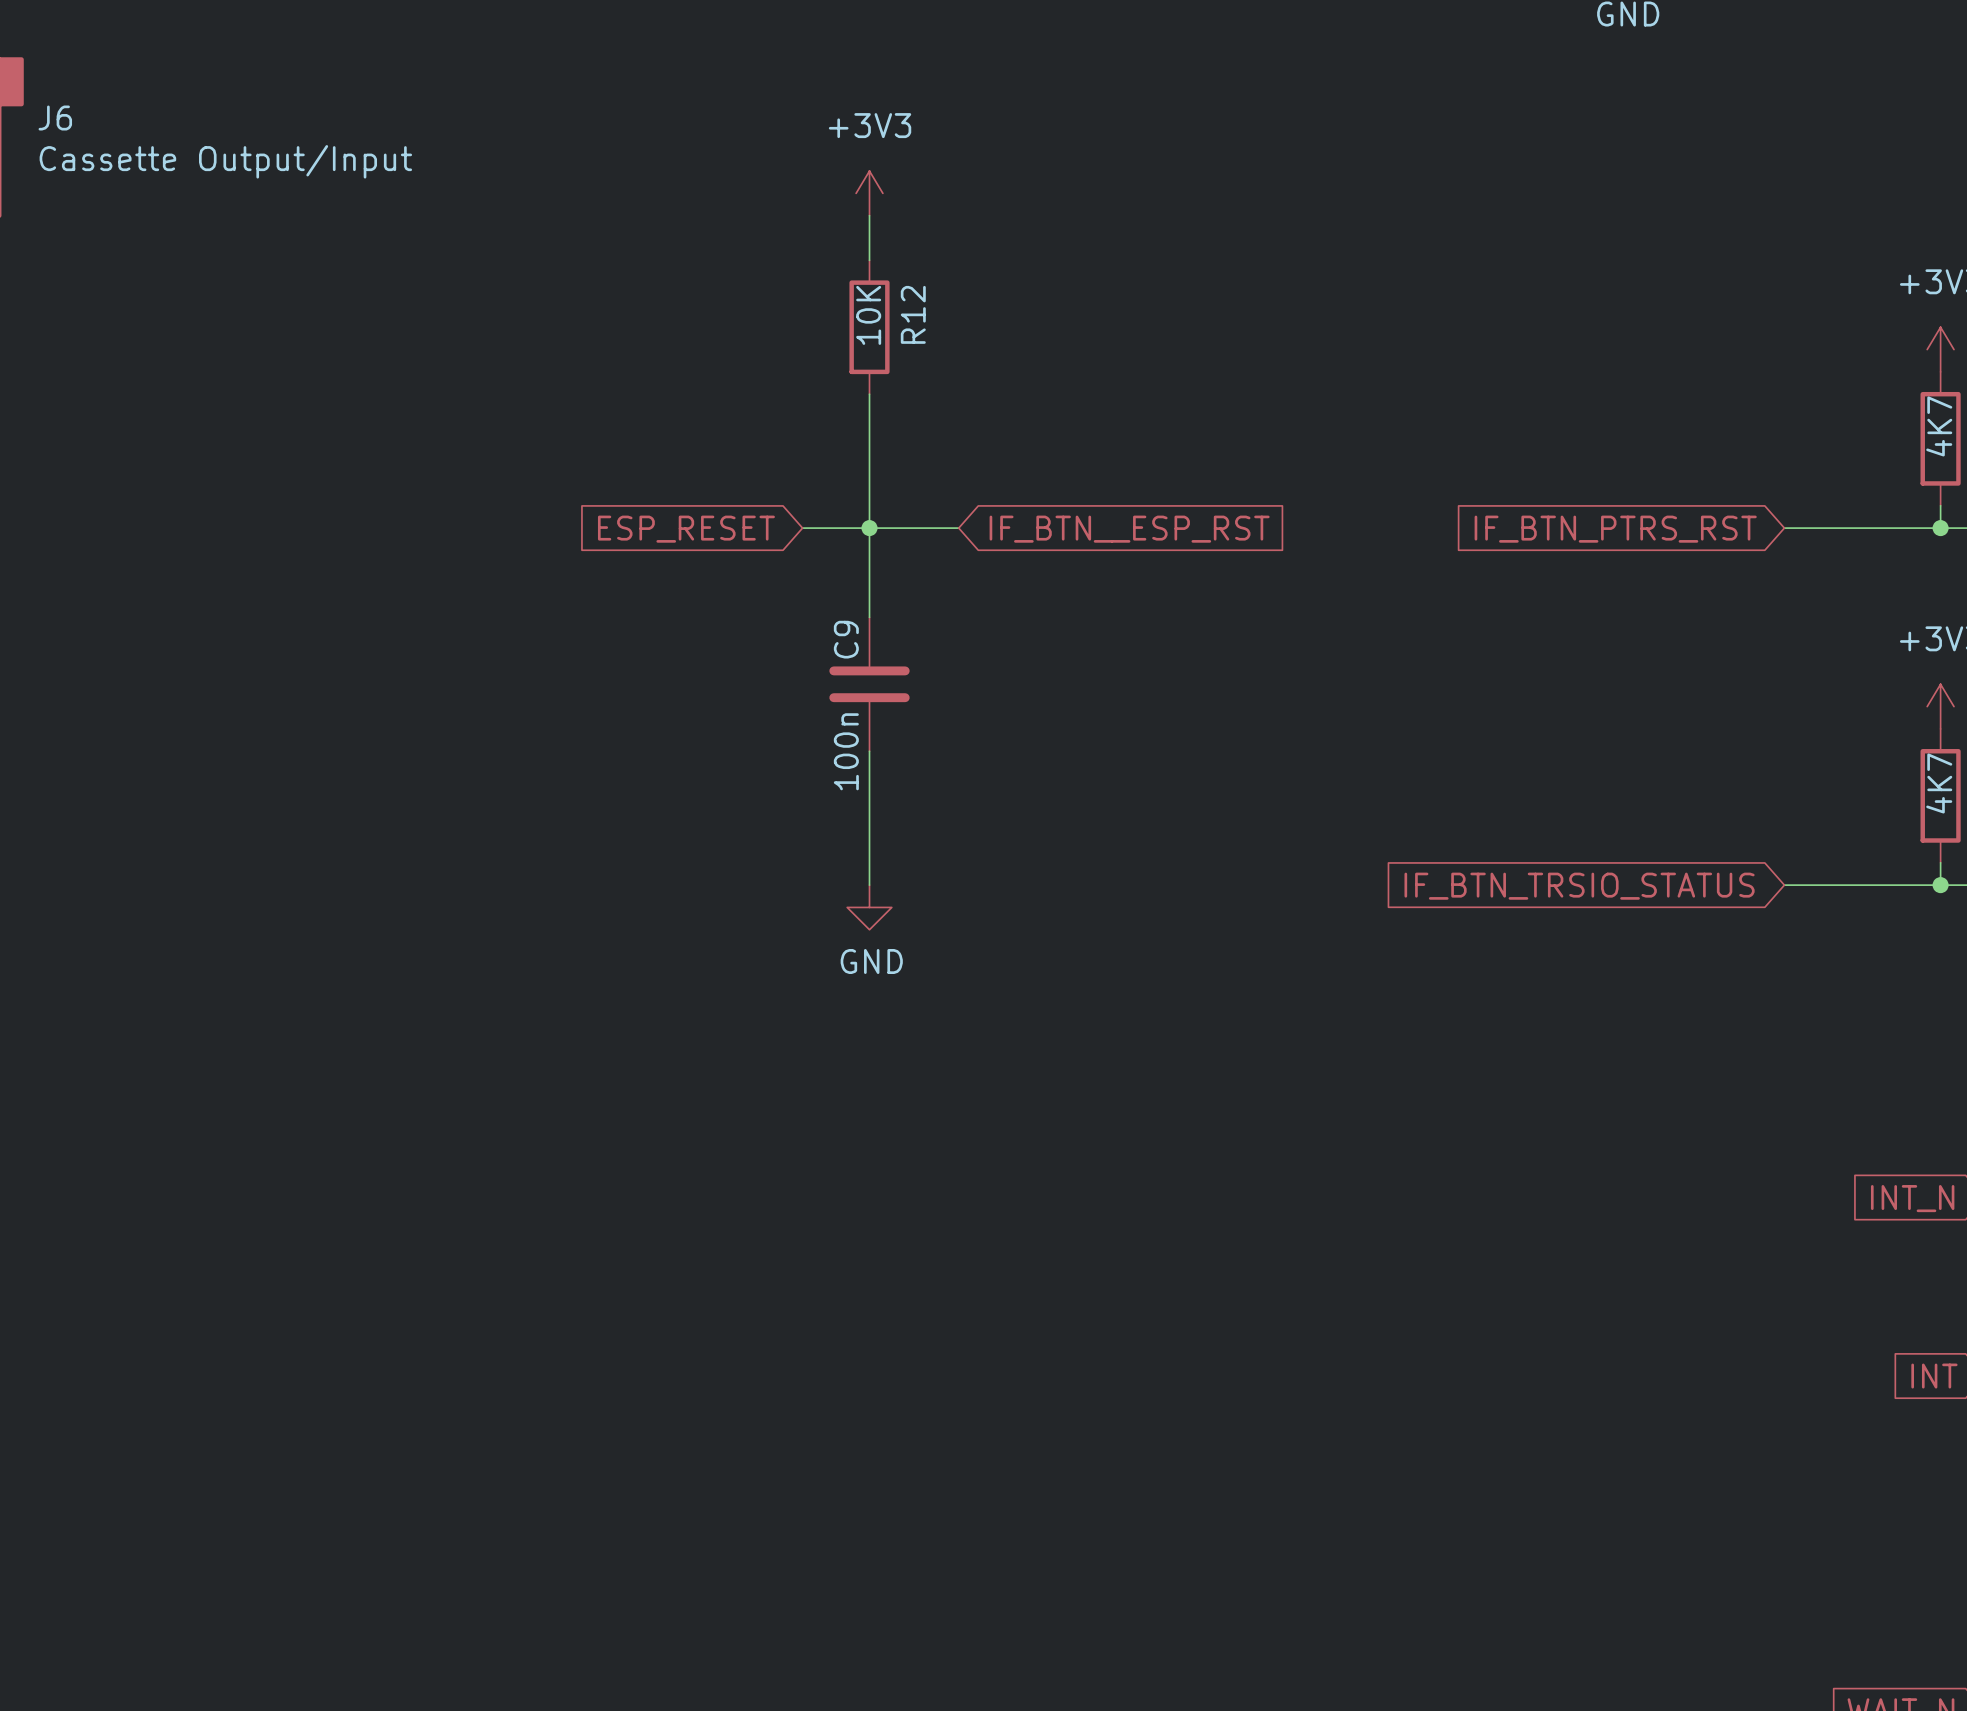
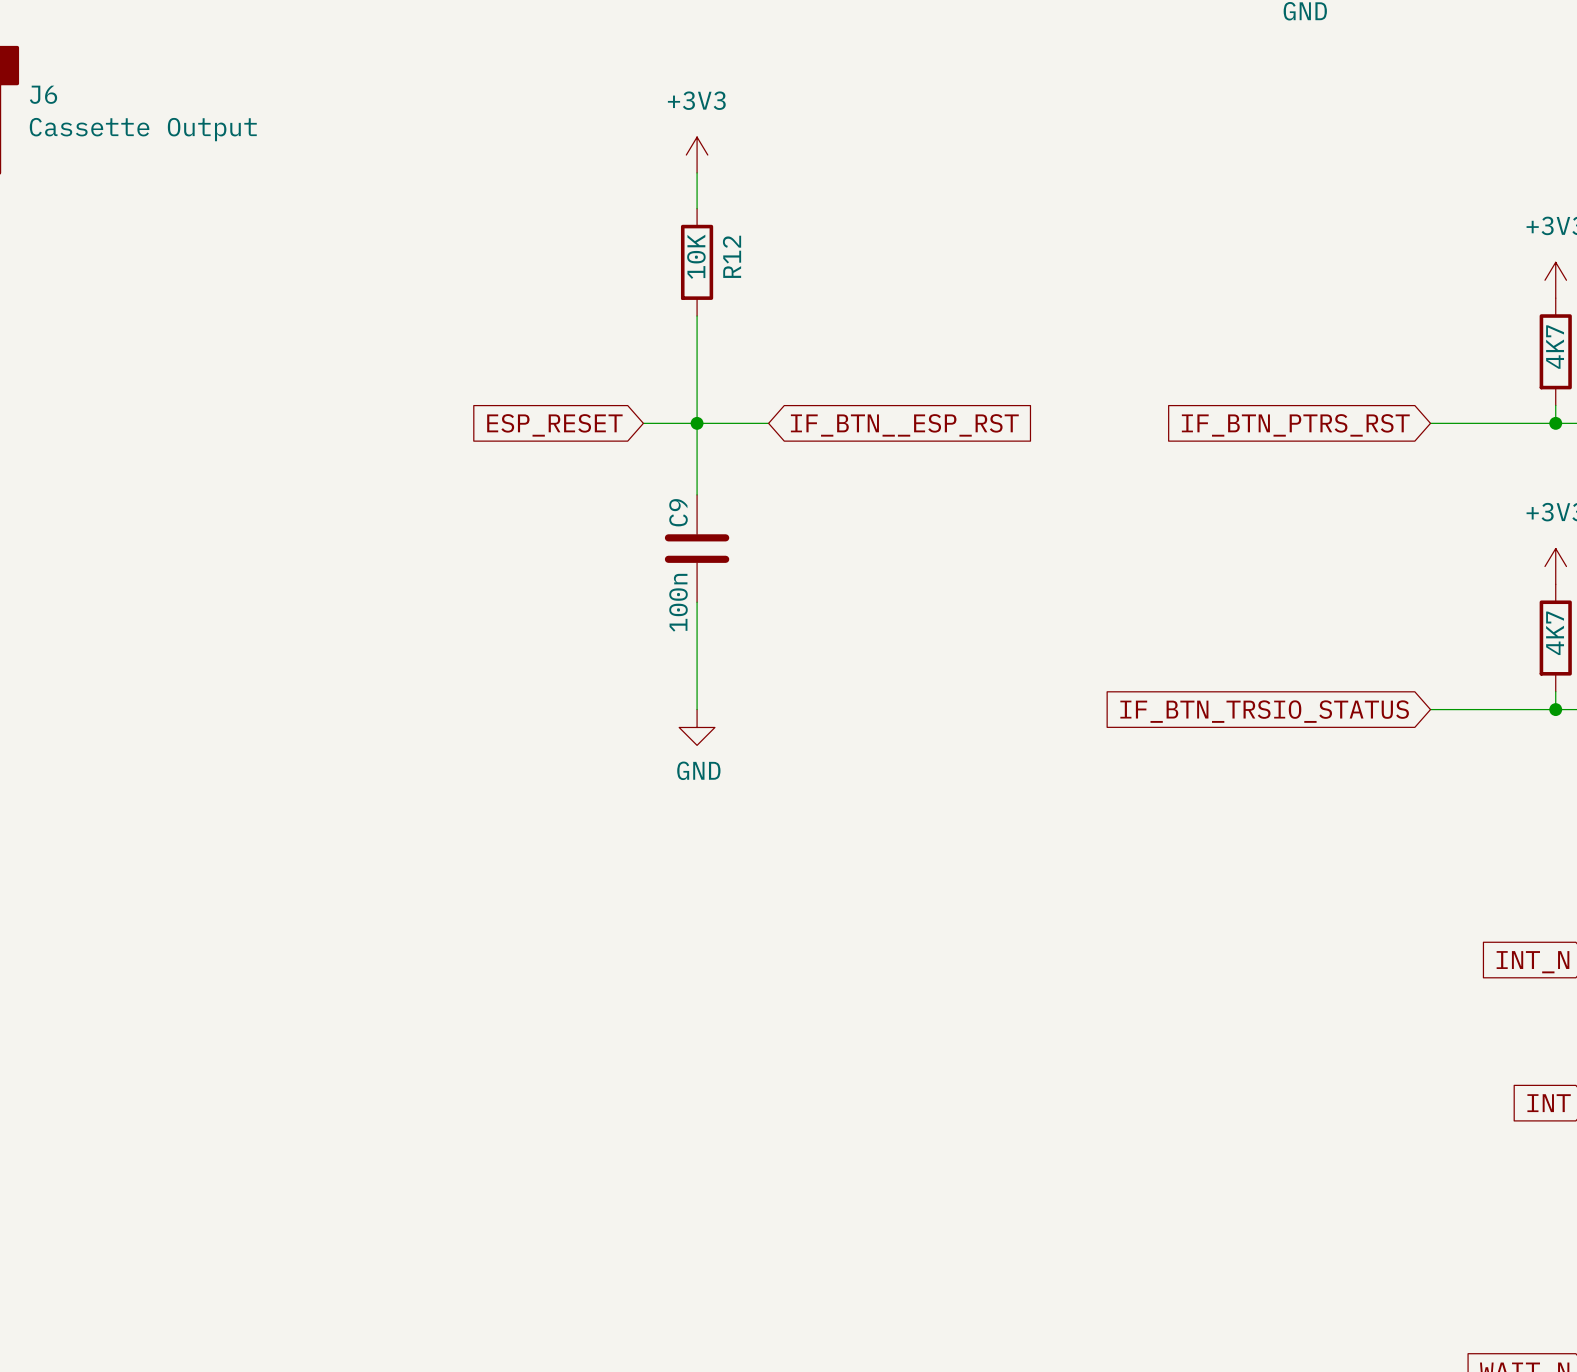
J6 value: Cassette Output/Input (225, 161) -> Cassette Output (143, 129)

